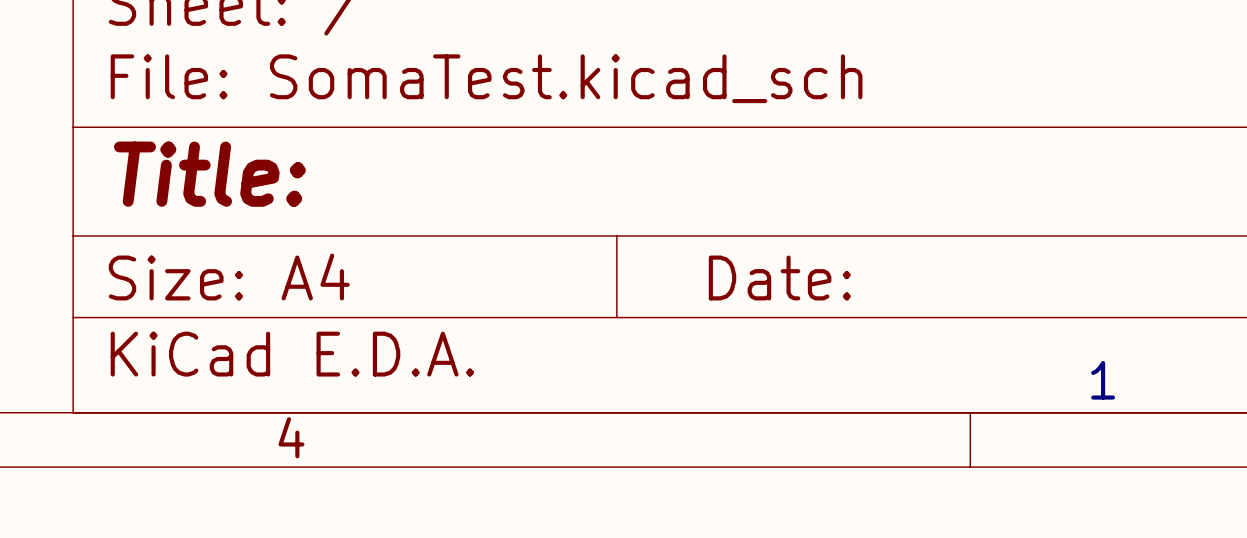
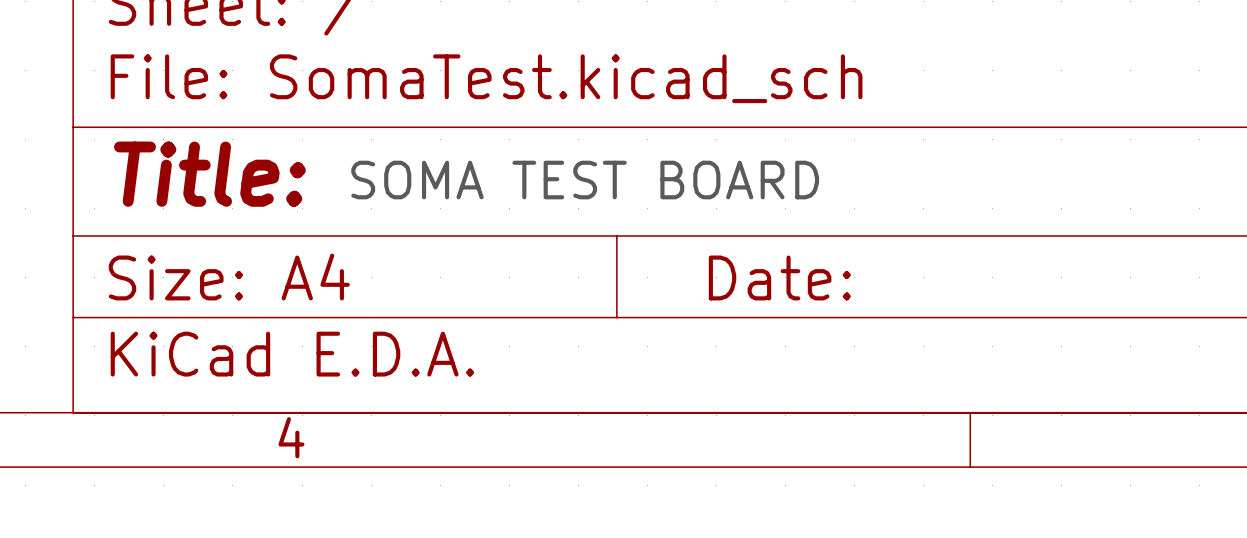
text: none -> SOMA TEST BOARD (585, 180)
text: 1 (1103, 380) -> none

